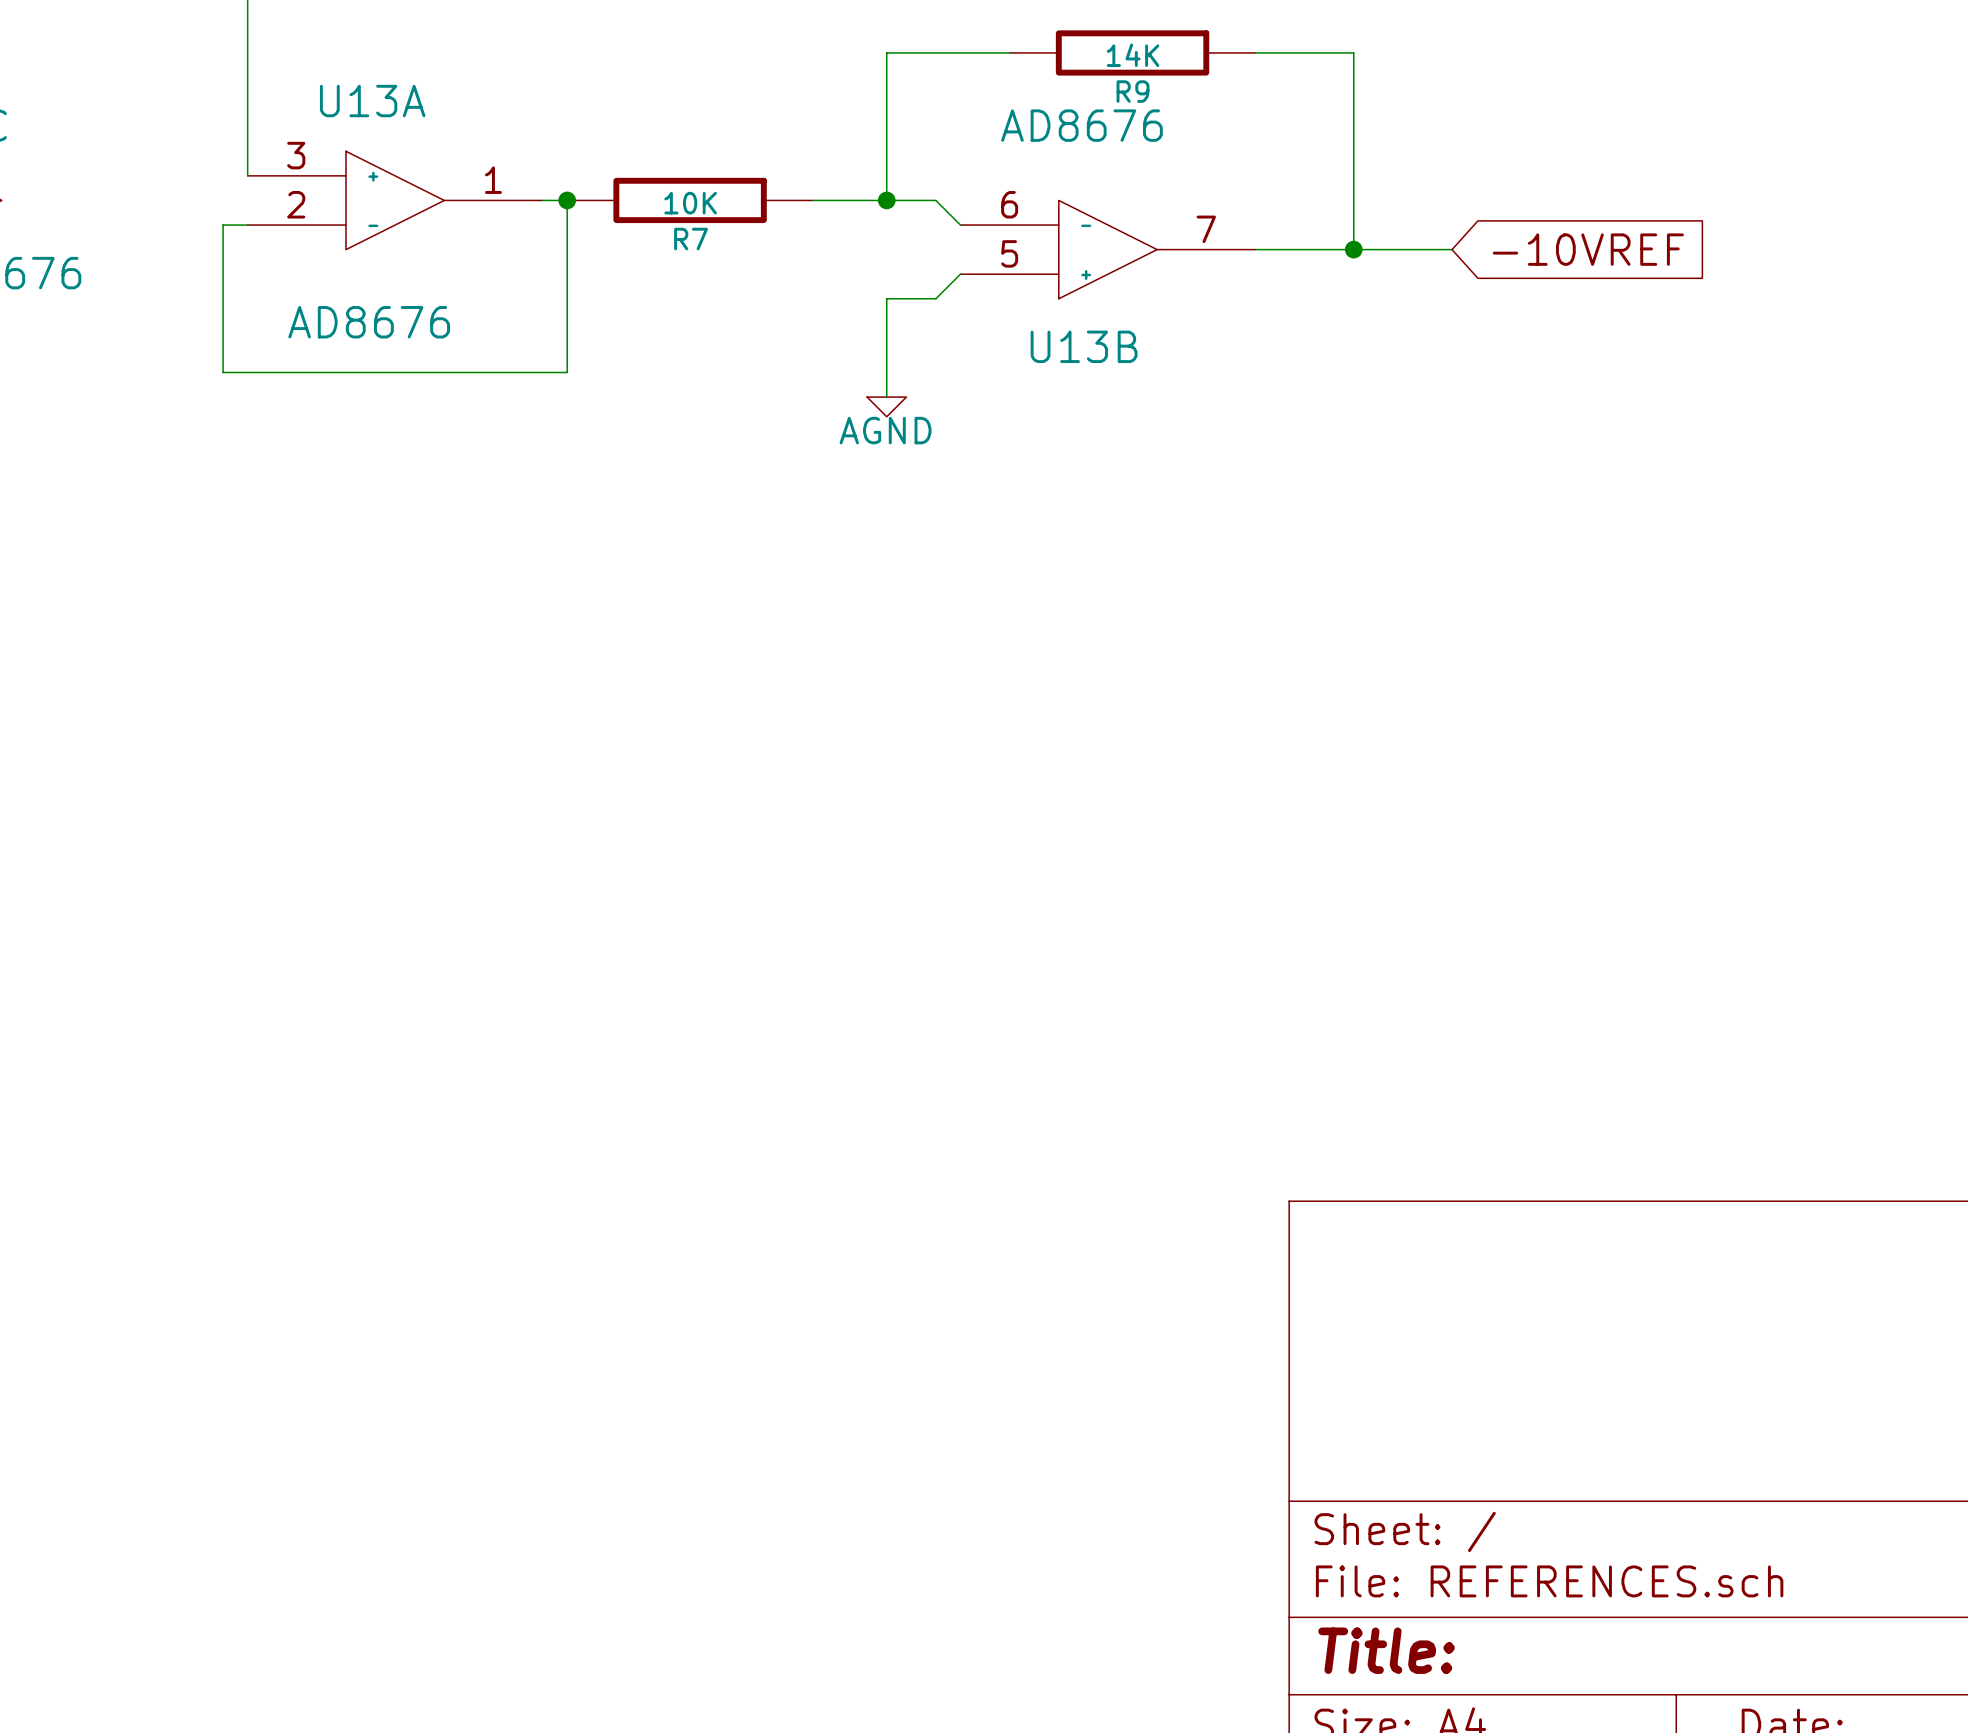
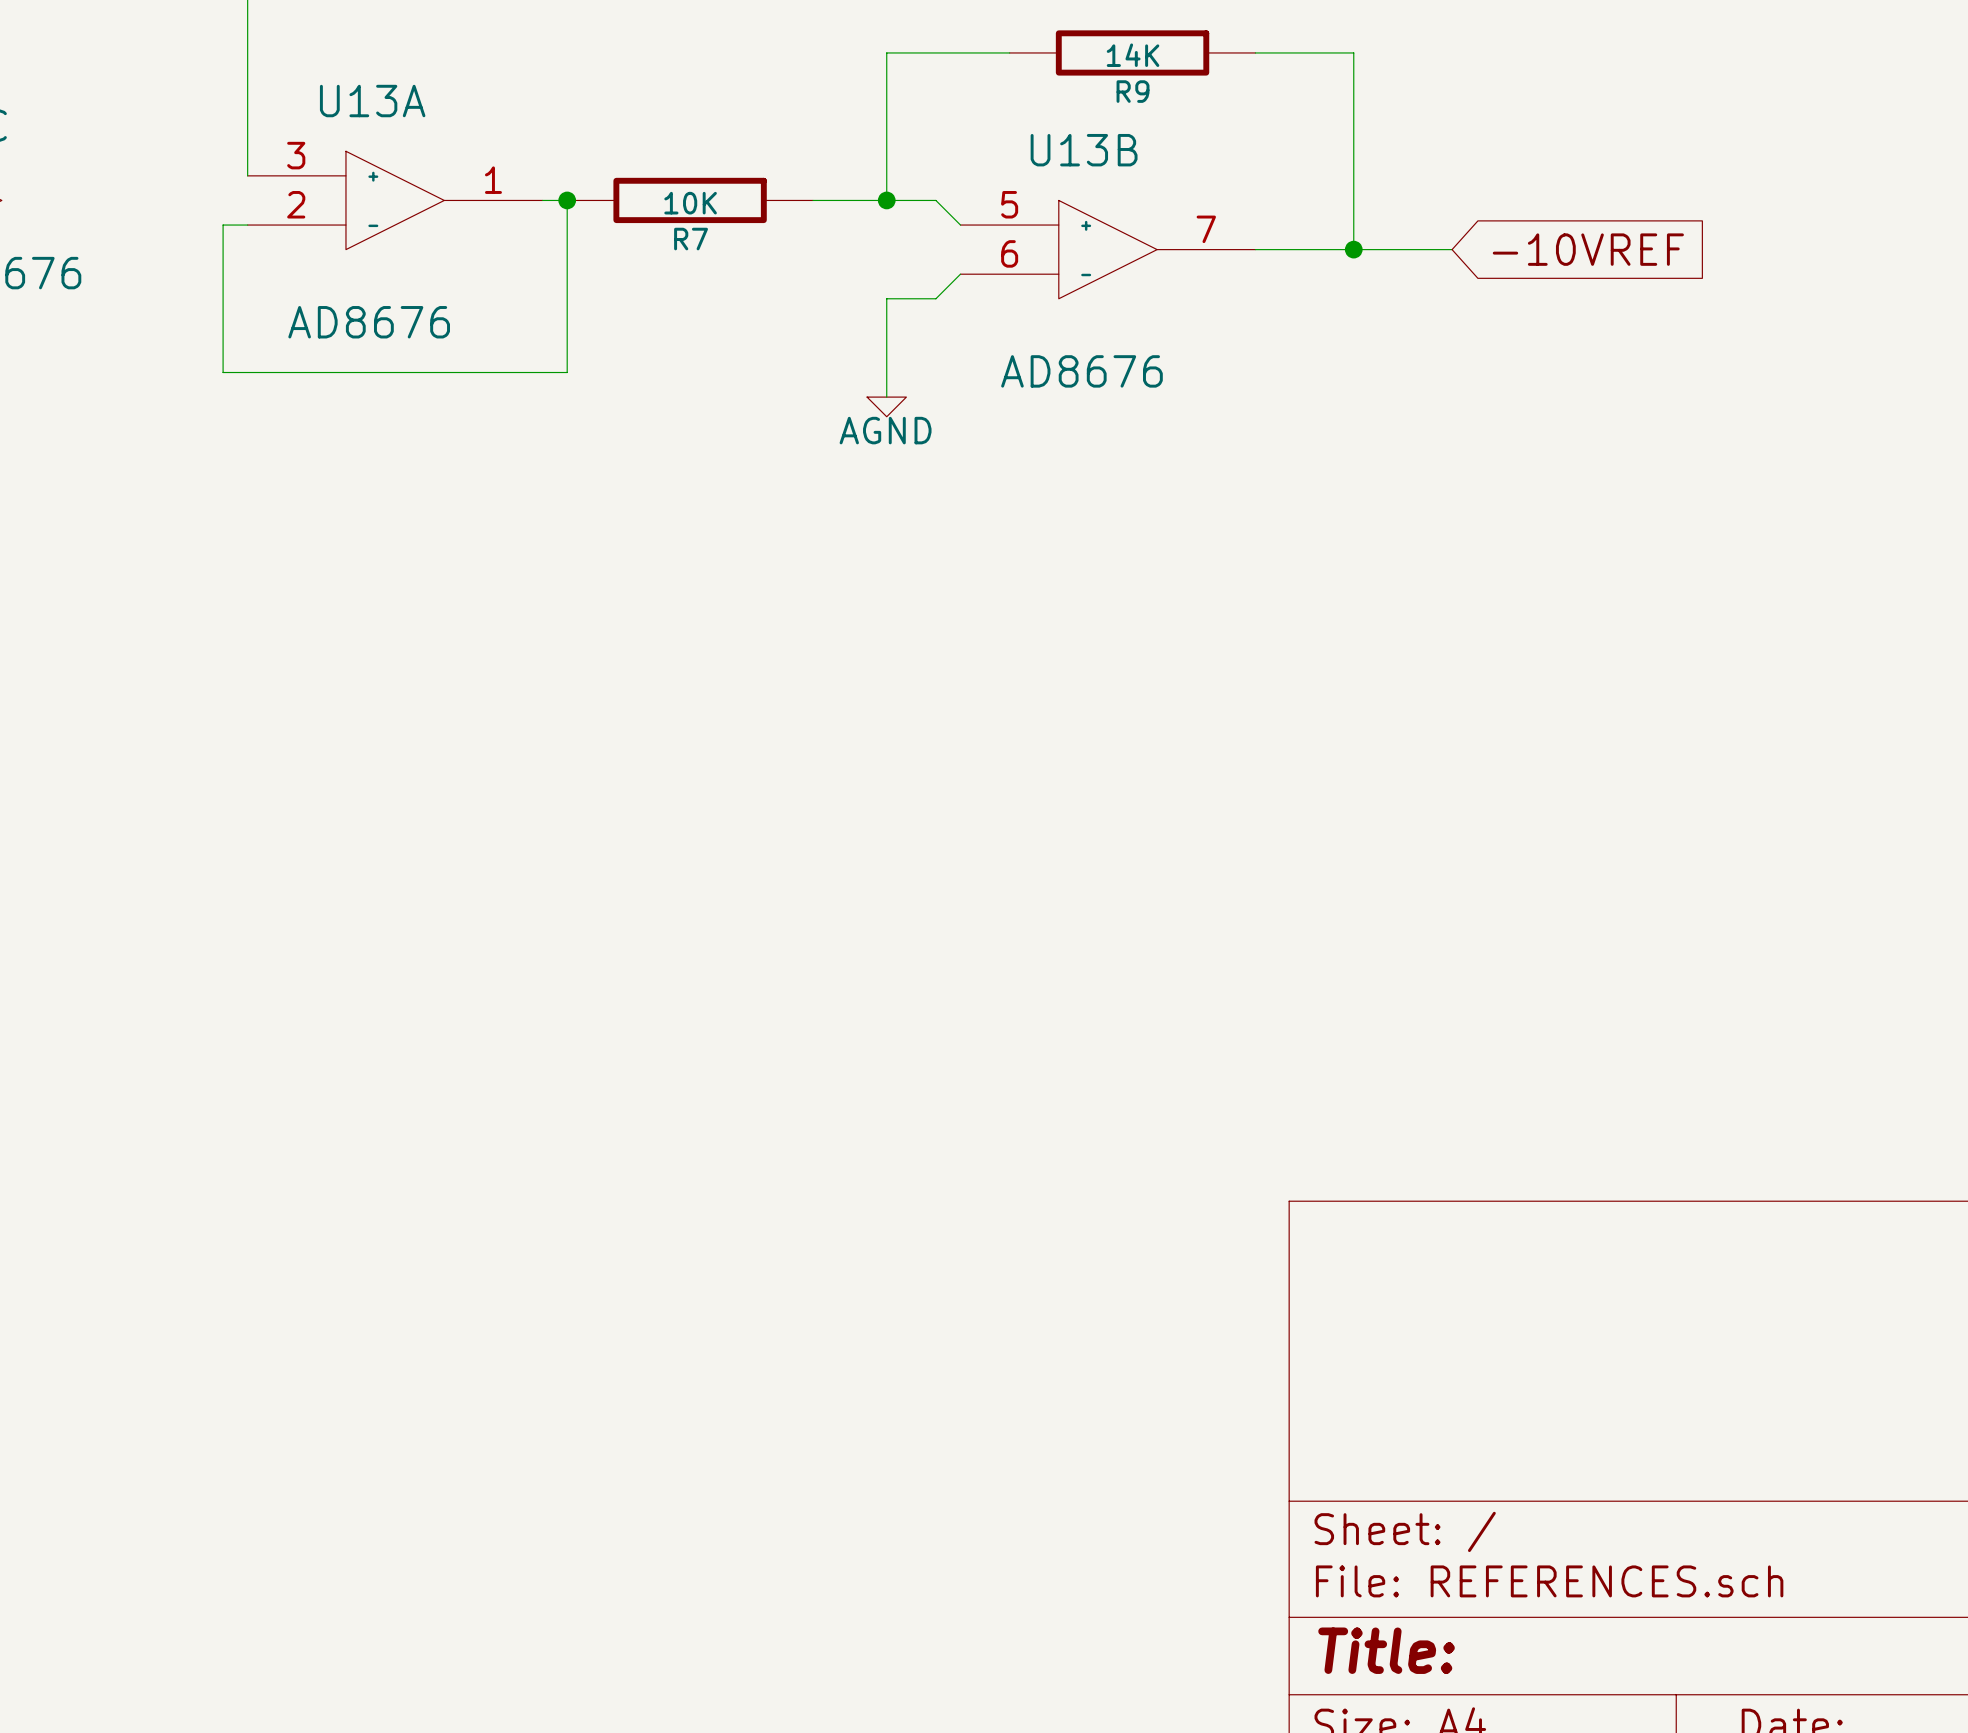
U13B flip: as is (1107, 249) -> up-down (1107, 249)

